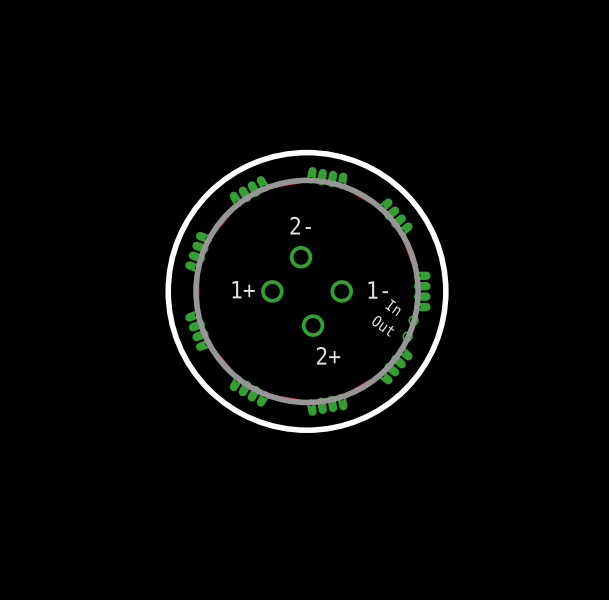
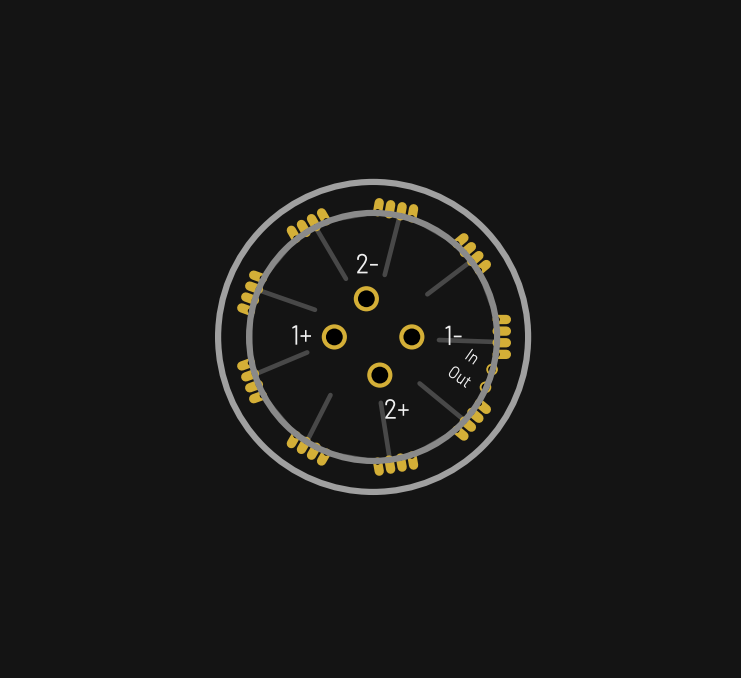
track: none -> (399, 215) (384, 274)
track: none -> (315, 227) (345, 278)
track: none -> (471, 260) (427, 294)
track: none -> (258, 289) (314, 309)
track: none -> (438, 340) (497, 341)
track: none -> (307, 352) (254, 374)
track: none -> (419, 383) (464, 420)
track: none -> (330, 395) (306, 441)
track: none -> (380, 402) (389, 459)

